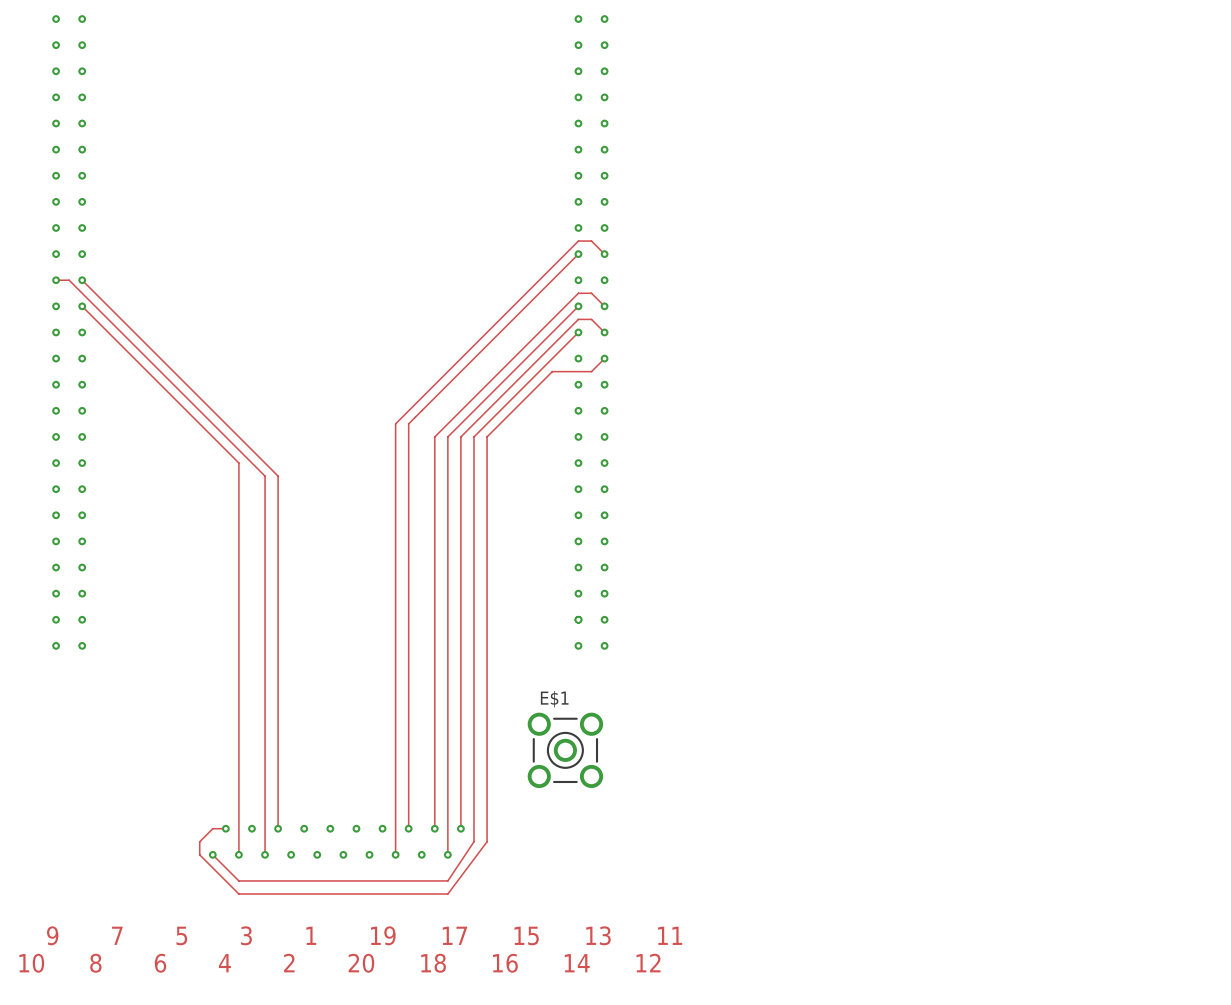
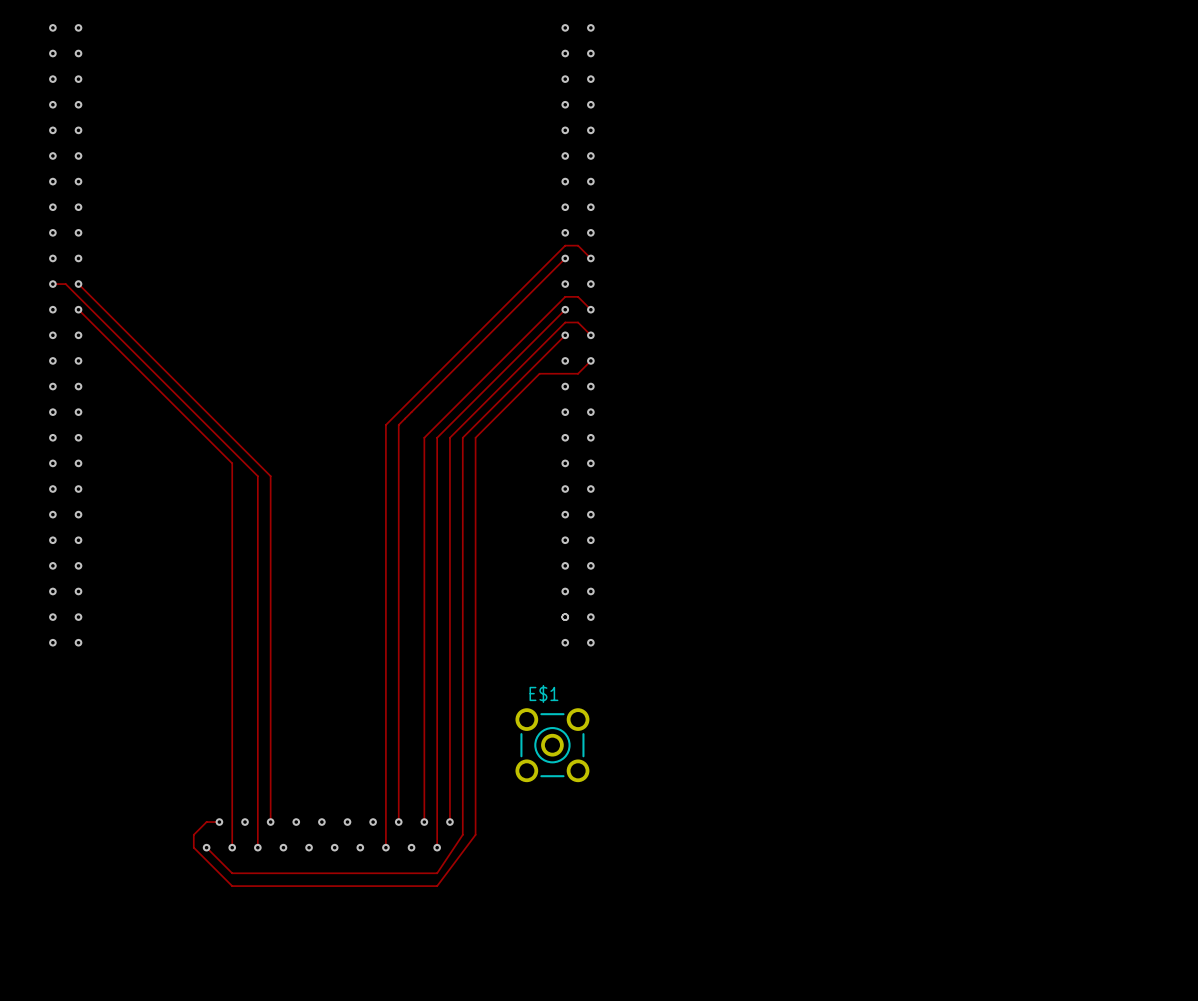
text: 9 7 5 3 1 19 17 15 13 11 (364, 935) -> none
text: 10 8 6 4 2 20 18 16 14 12 (339, 963) -> none

